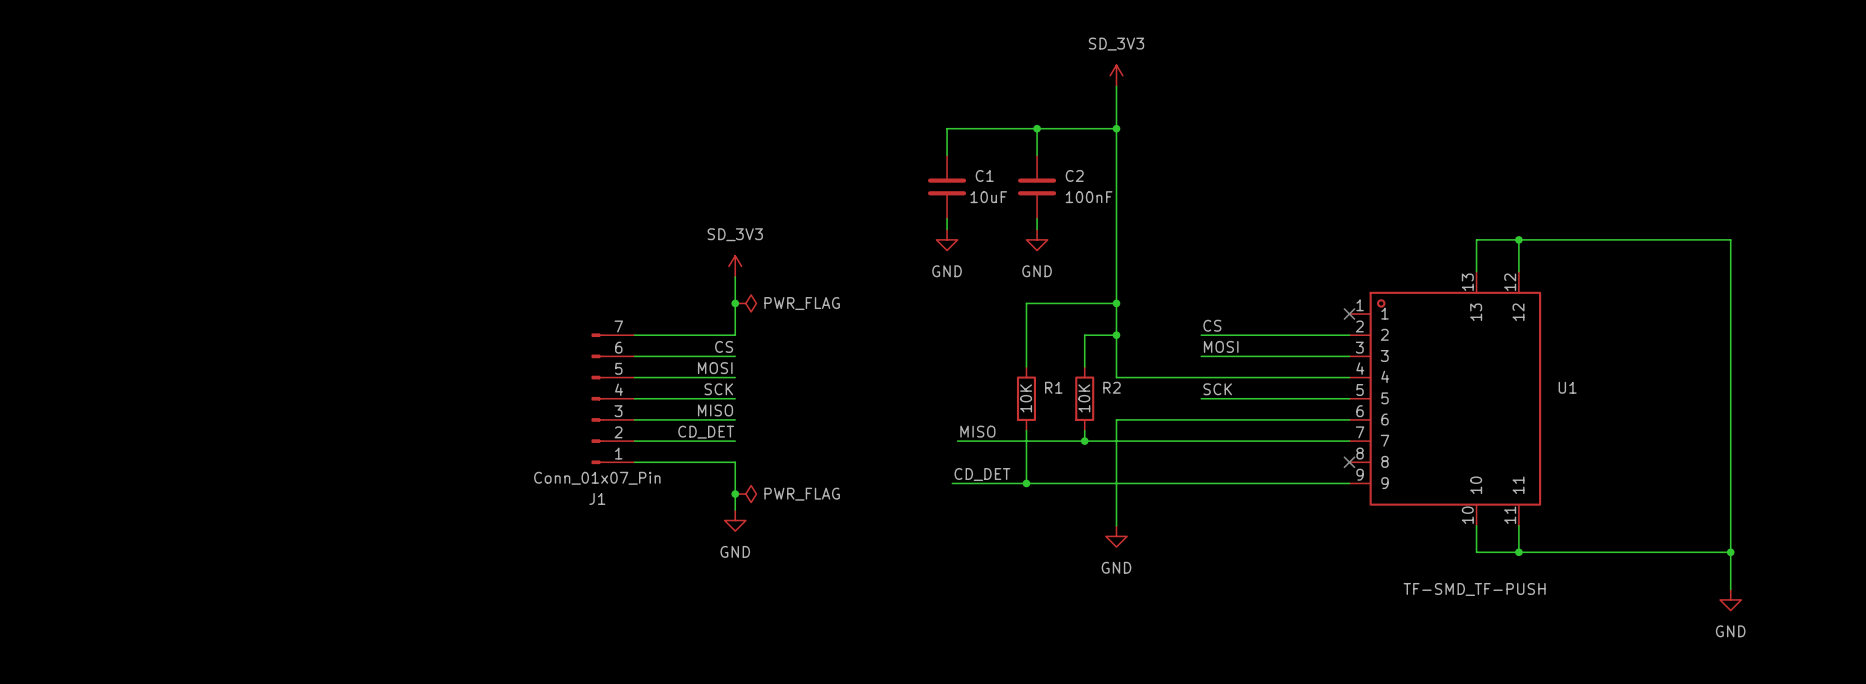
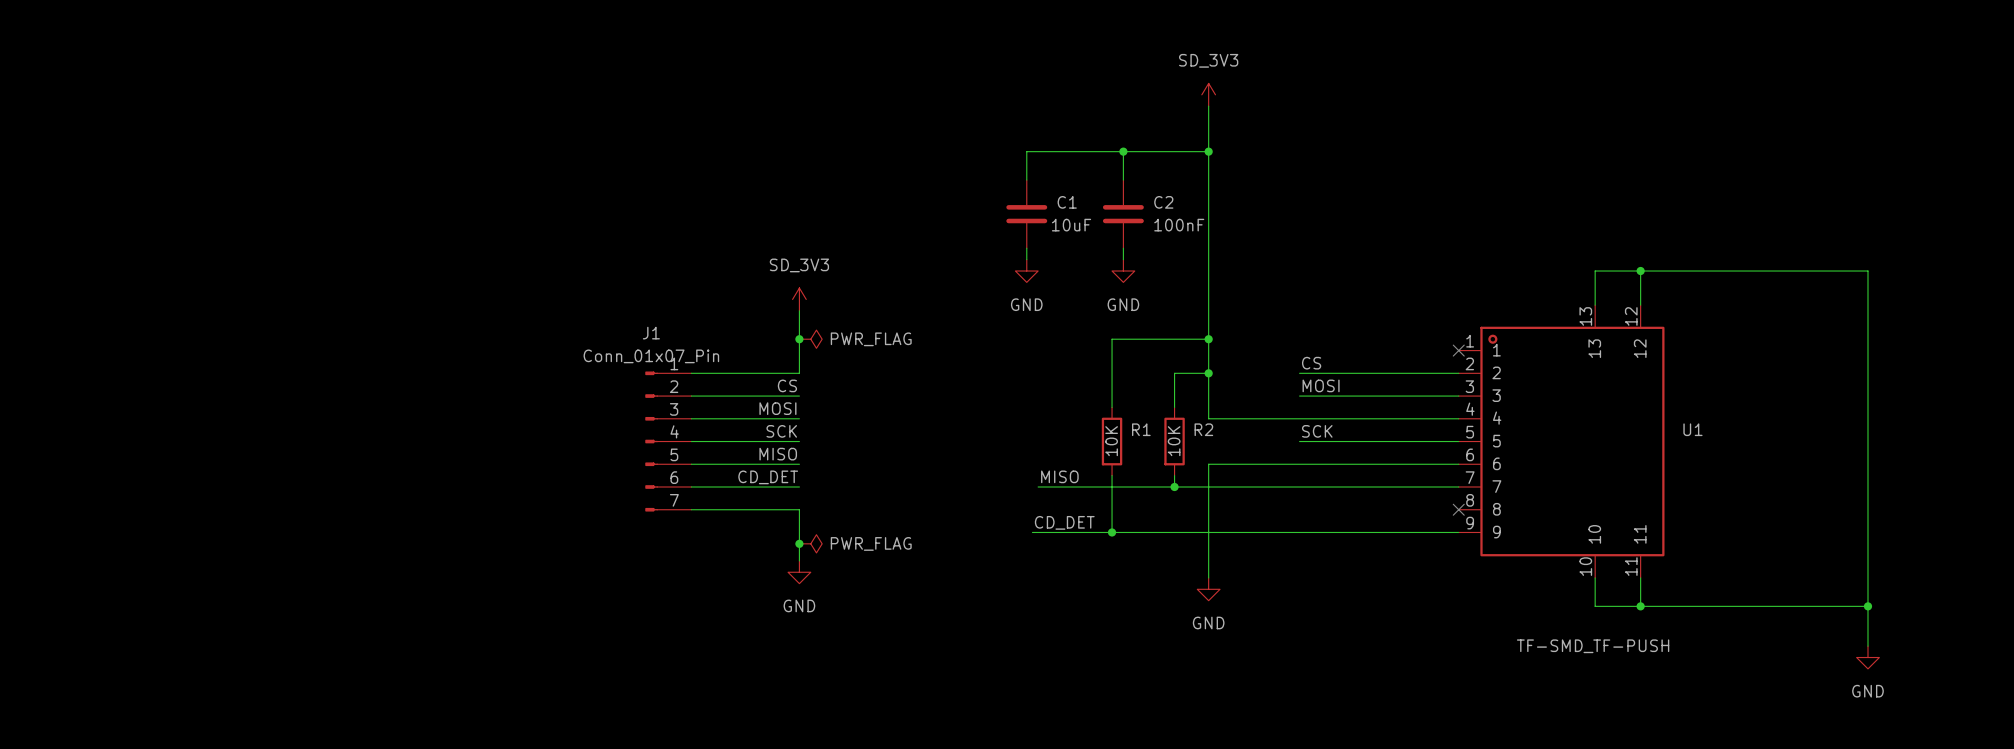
J1 flip: as is (597, 398) -> up-down (651, 441)

